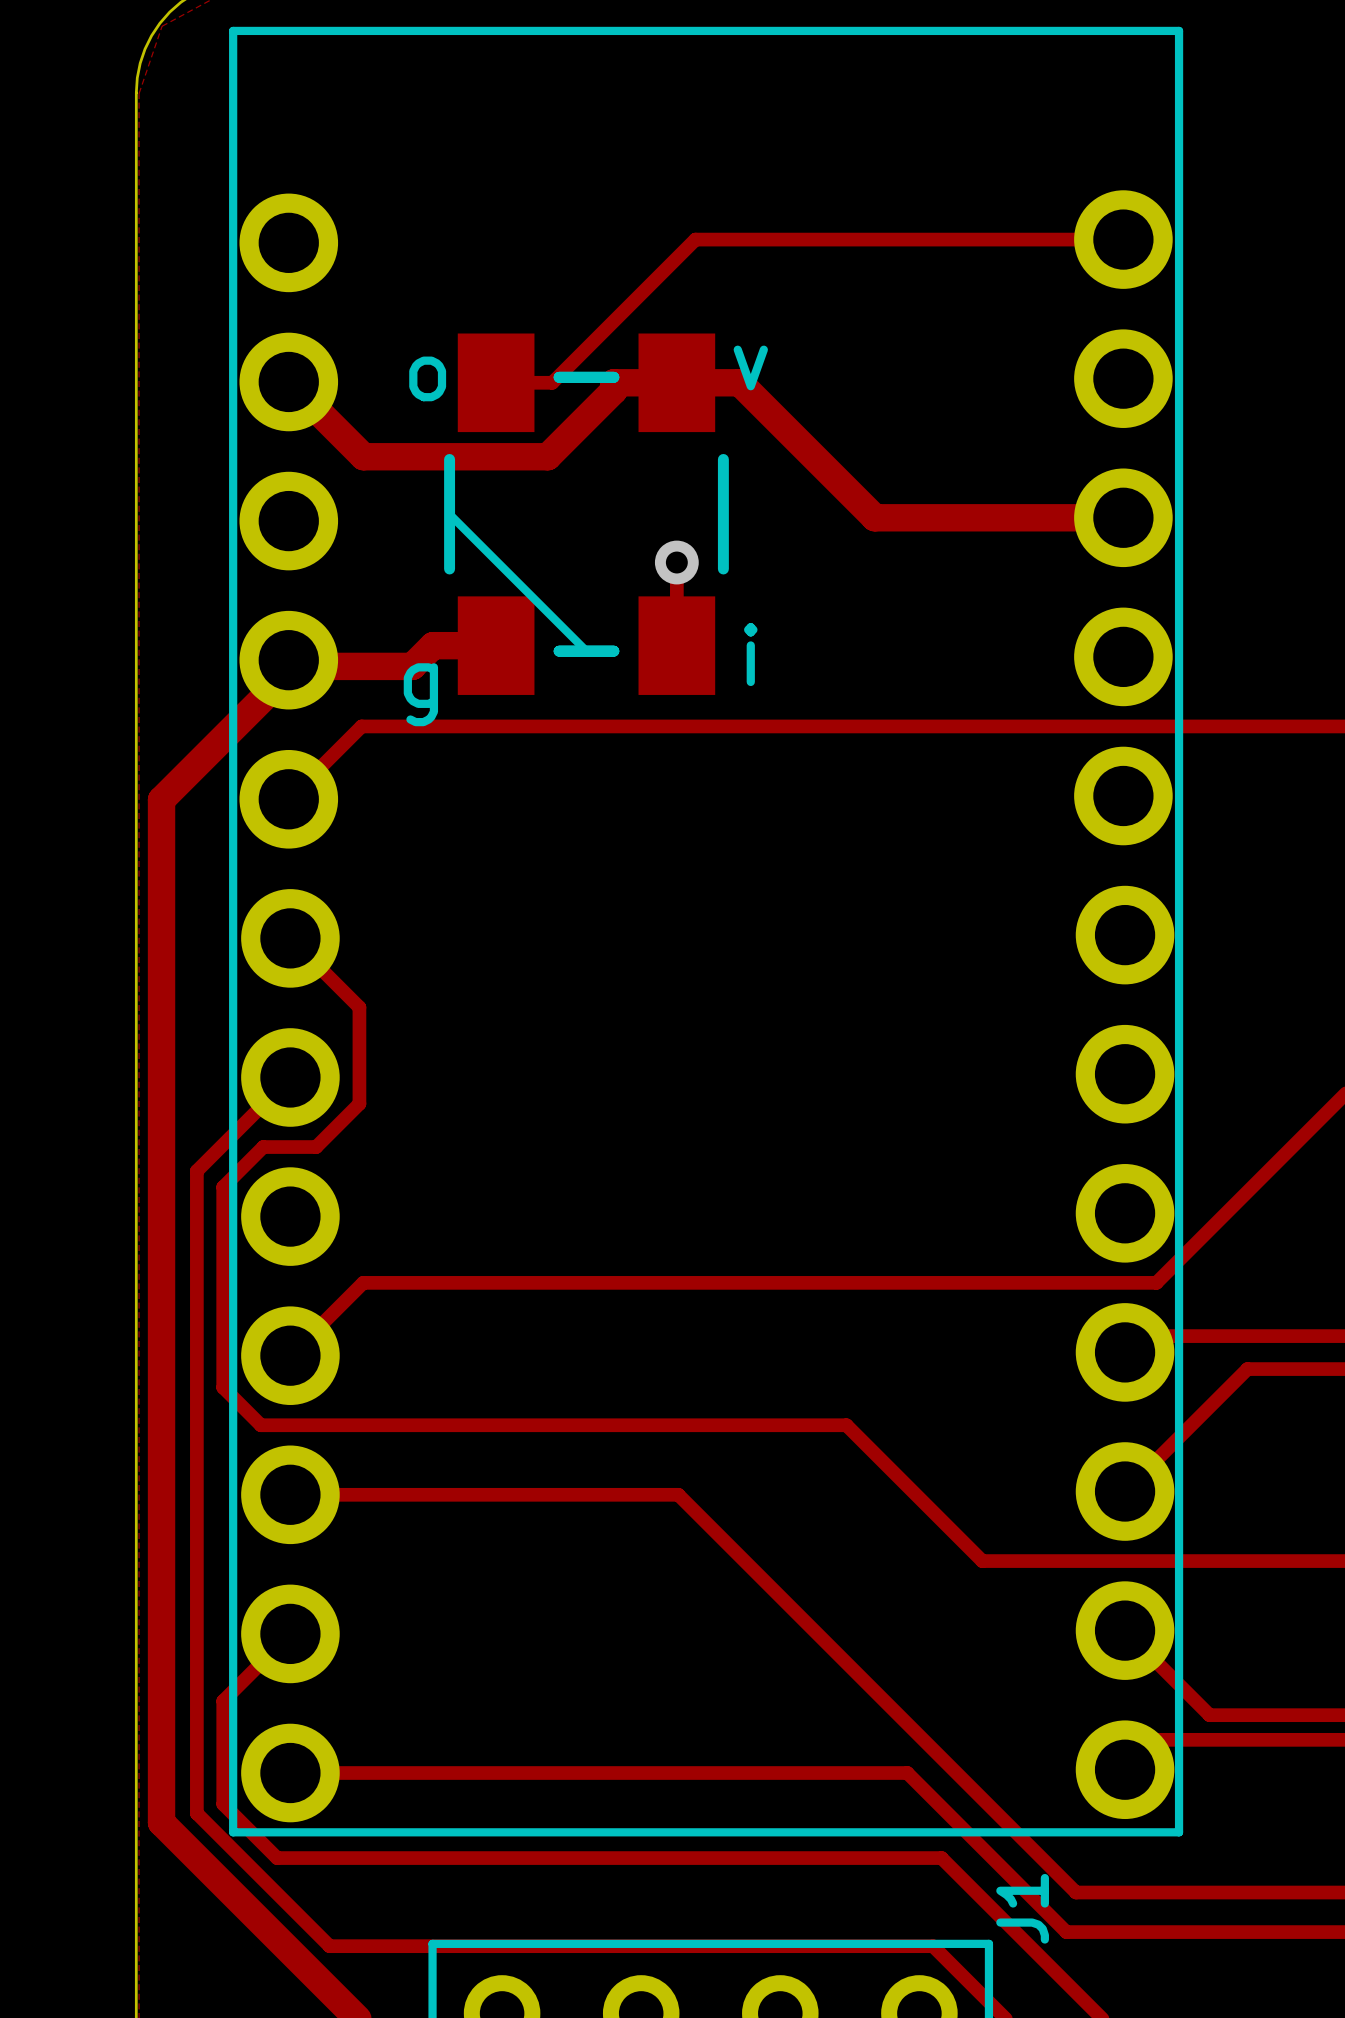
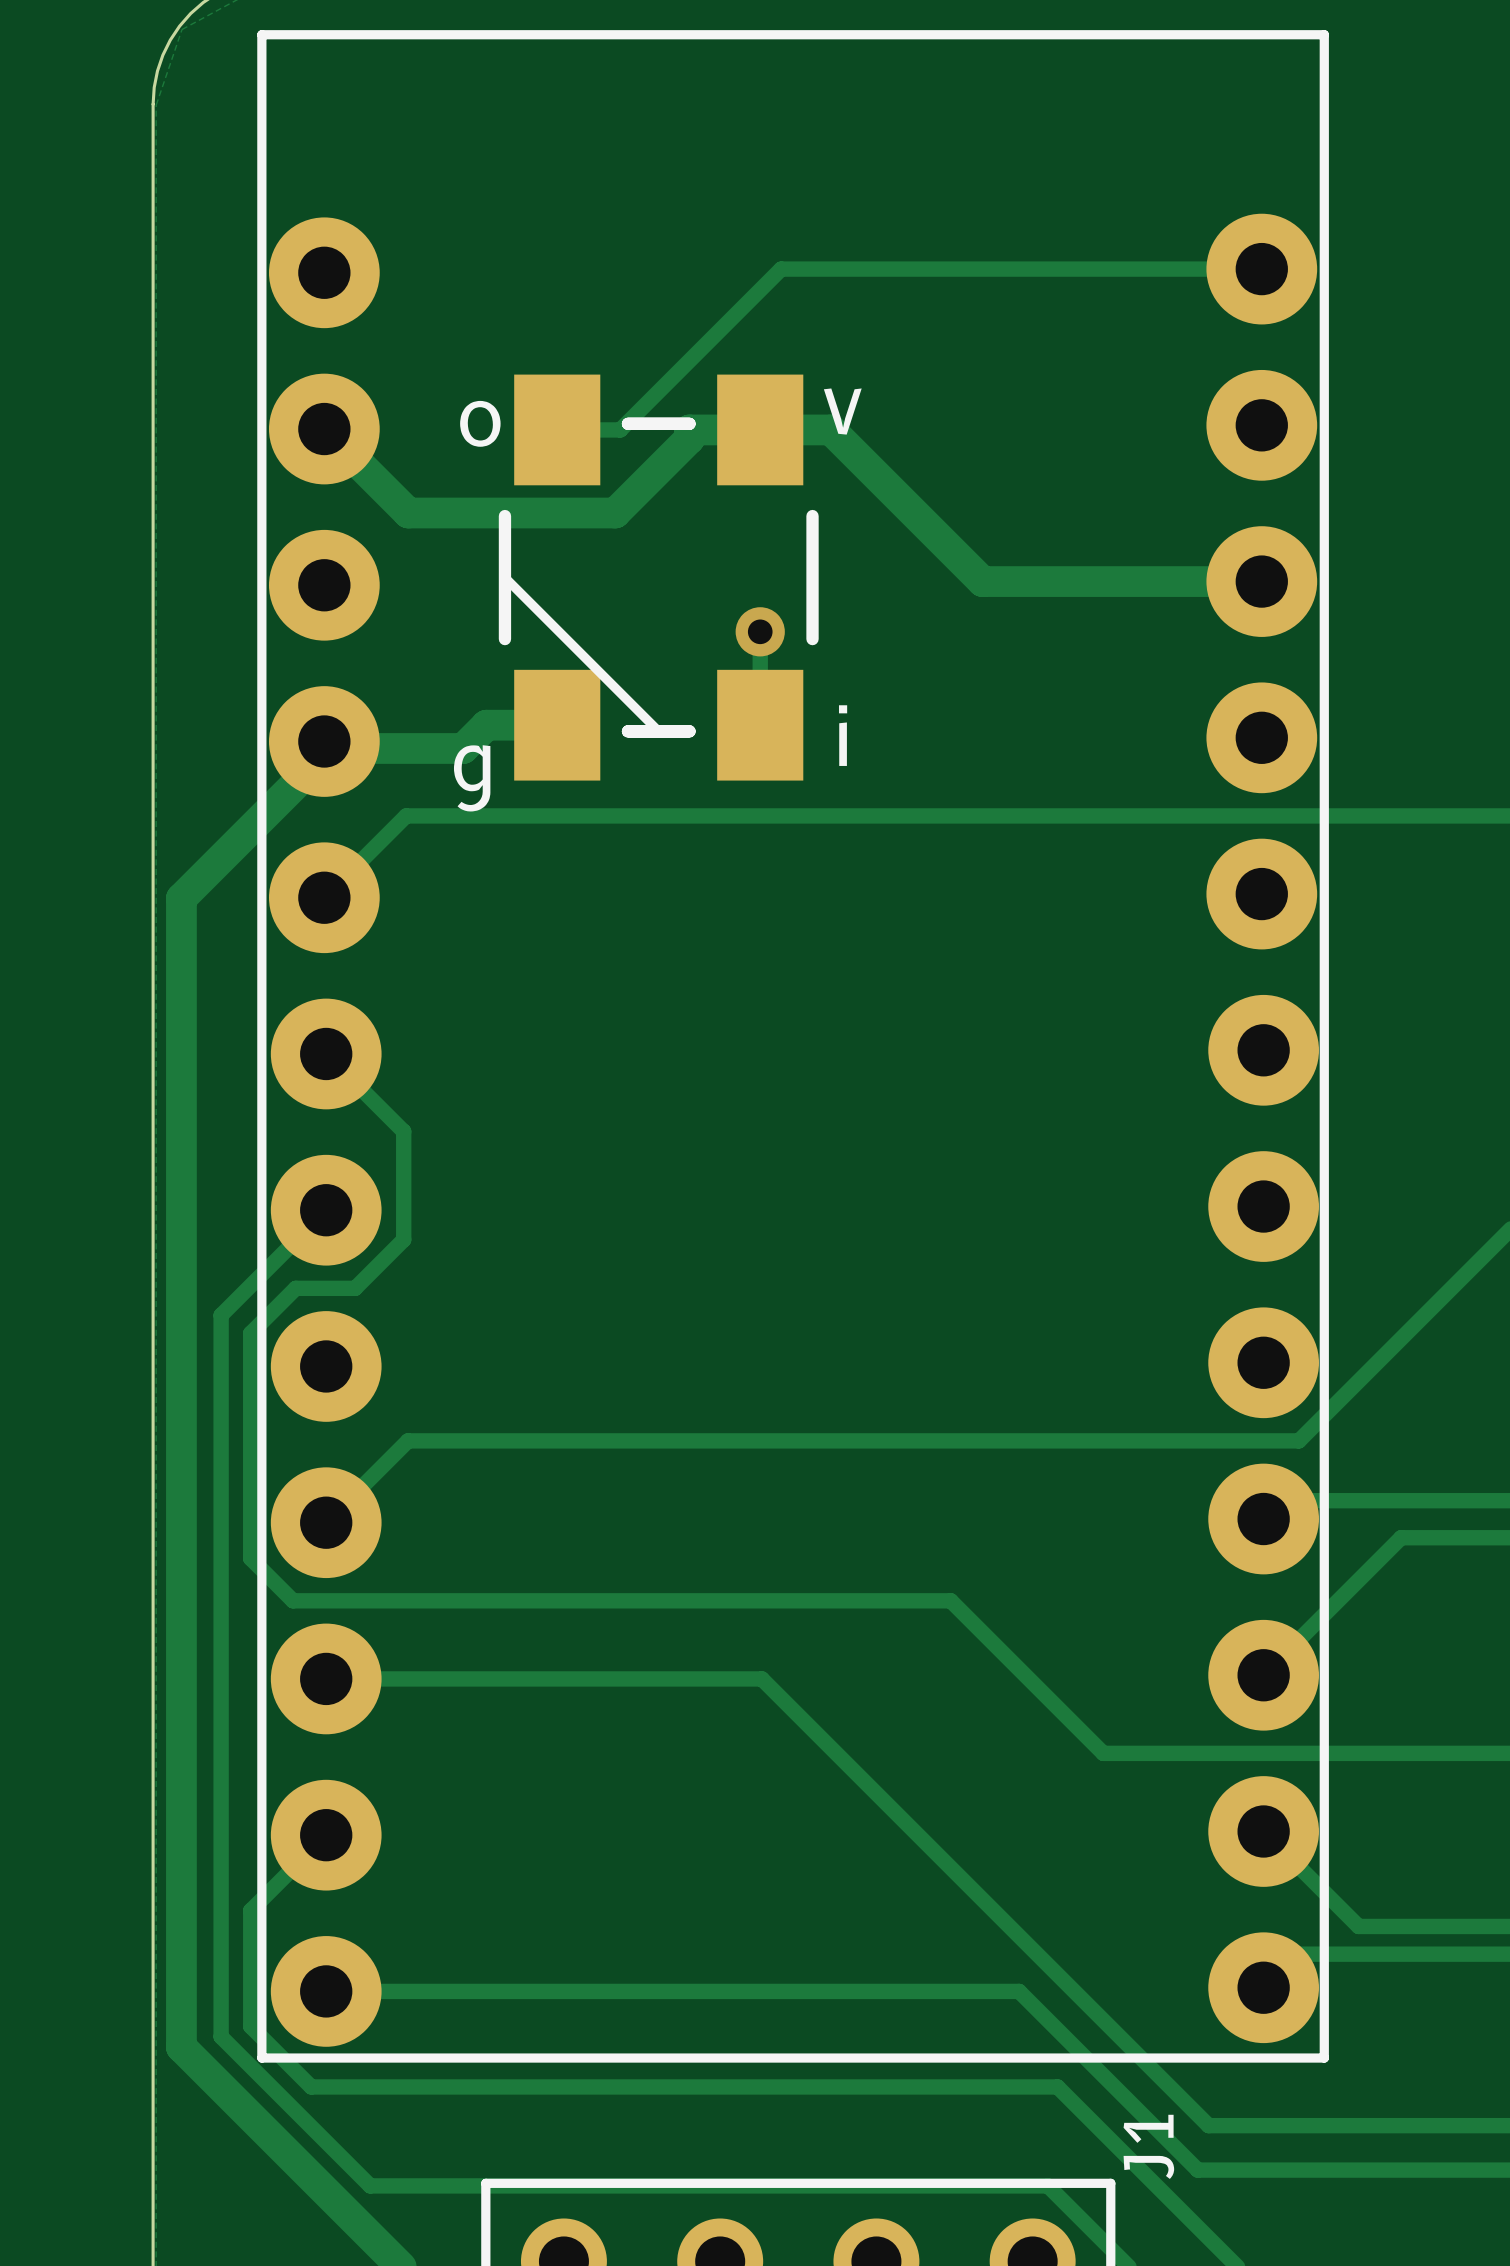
part footprint: [229, 26, 1184, 1837] -> [257, 30, 1329, 2063]

